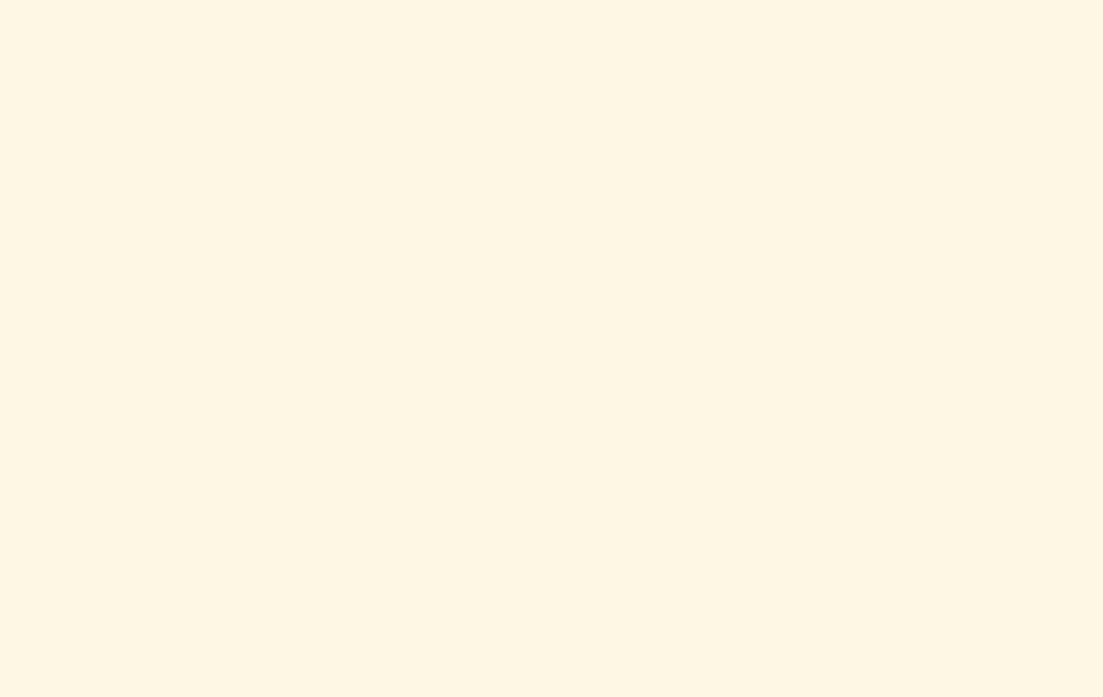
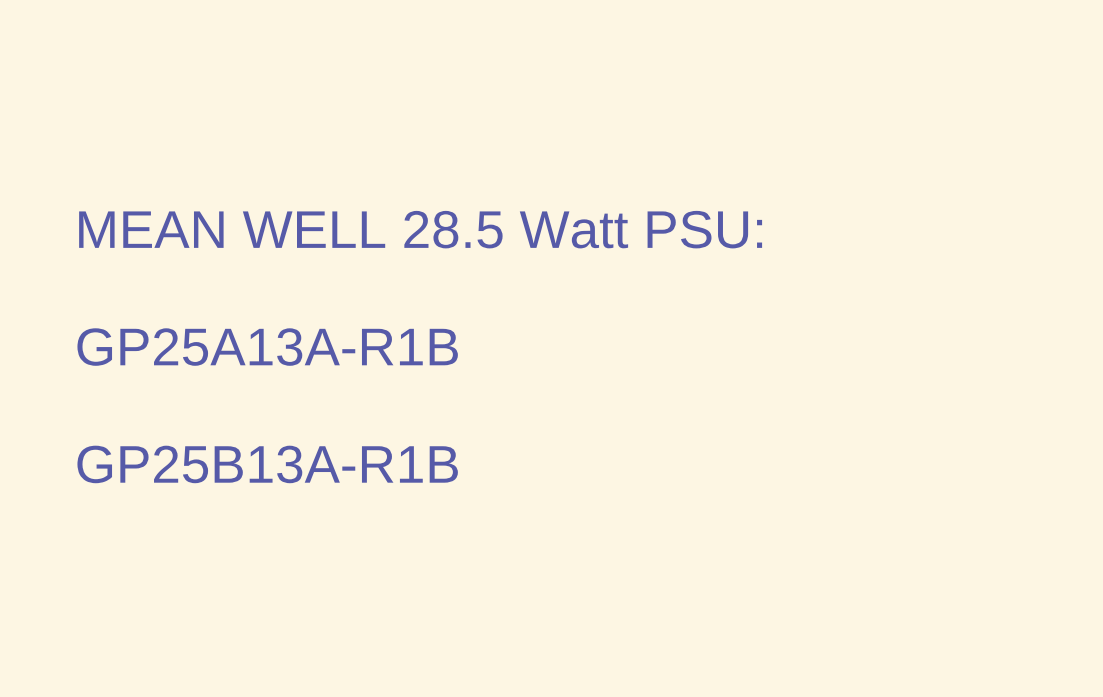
text: none -> MEAN WELL 28.5 Watt PSU: (420, 229)
text: none -> GP25A13A-R1B (267, 347)
text: none -> GP25B13A-R1B (267, 464)

